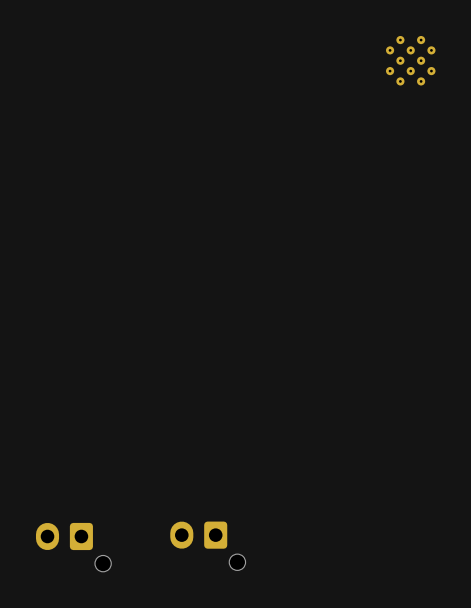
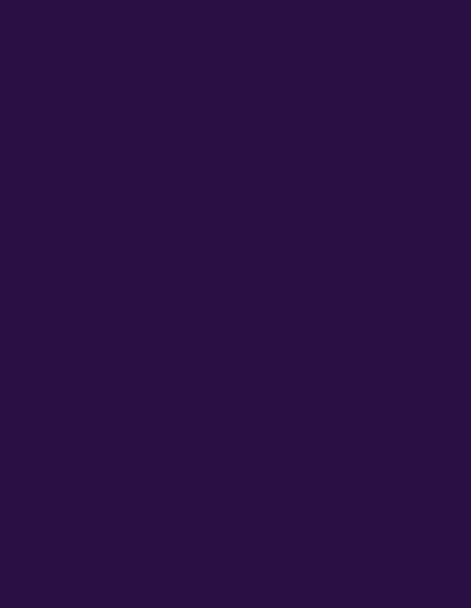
part: (410, 60) -> none
part: (207, 545) -> none
part: (73, 547) -> none

